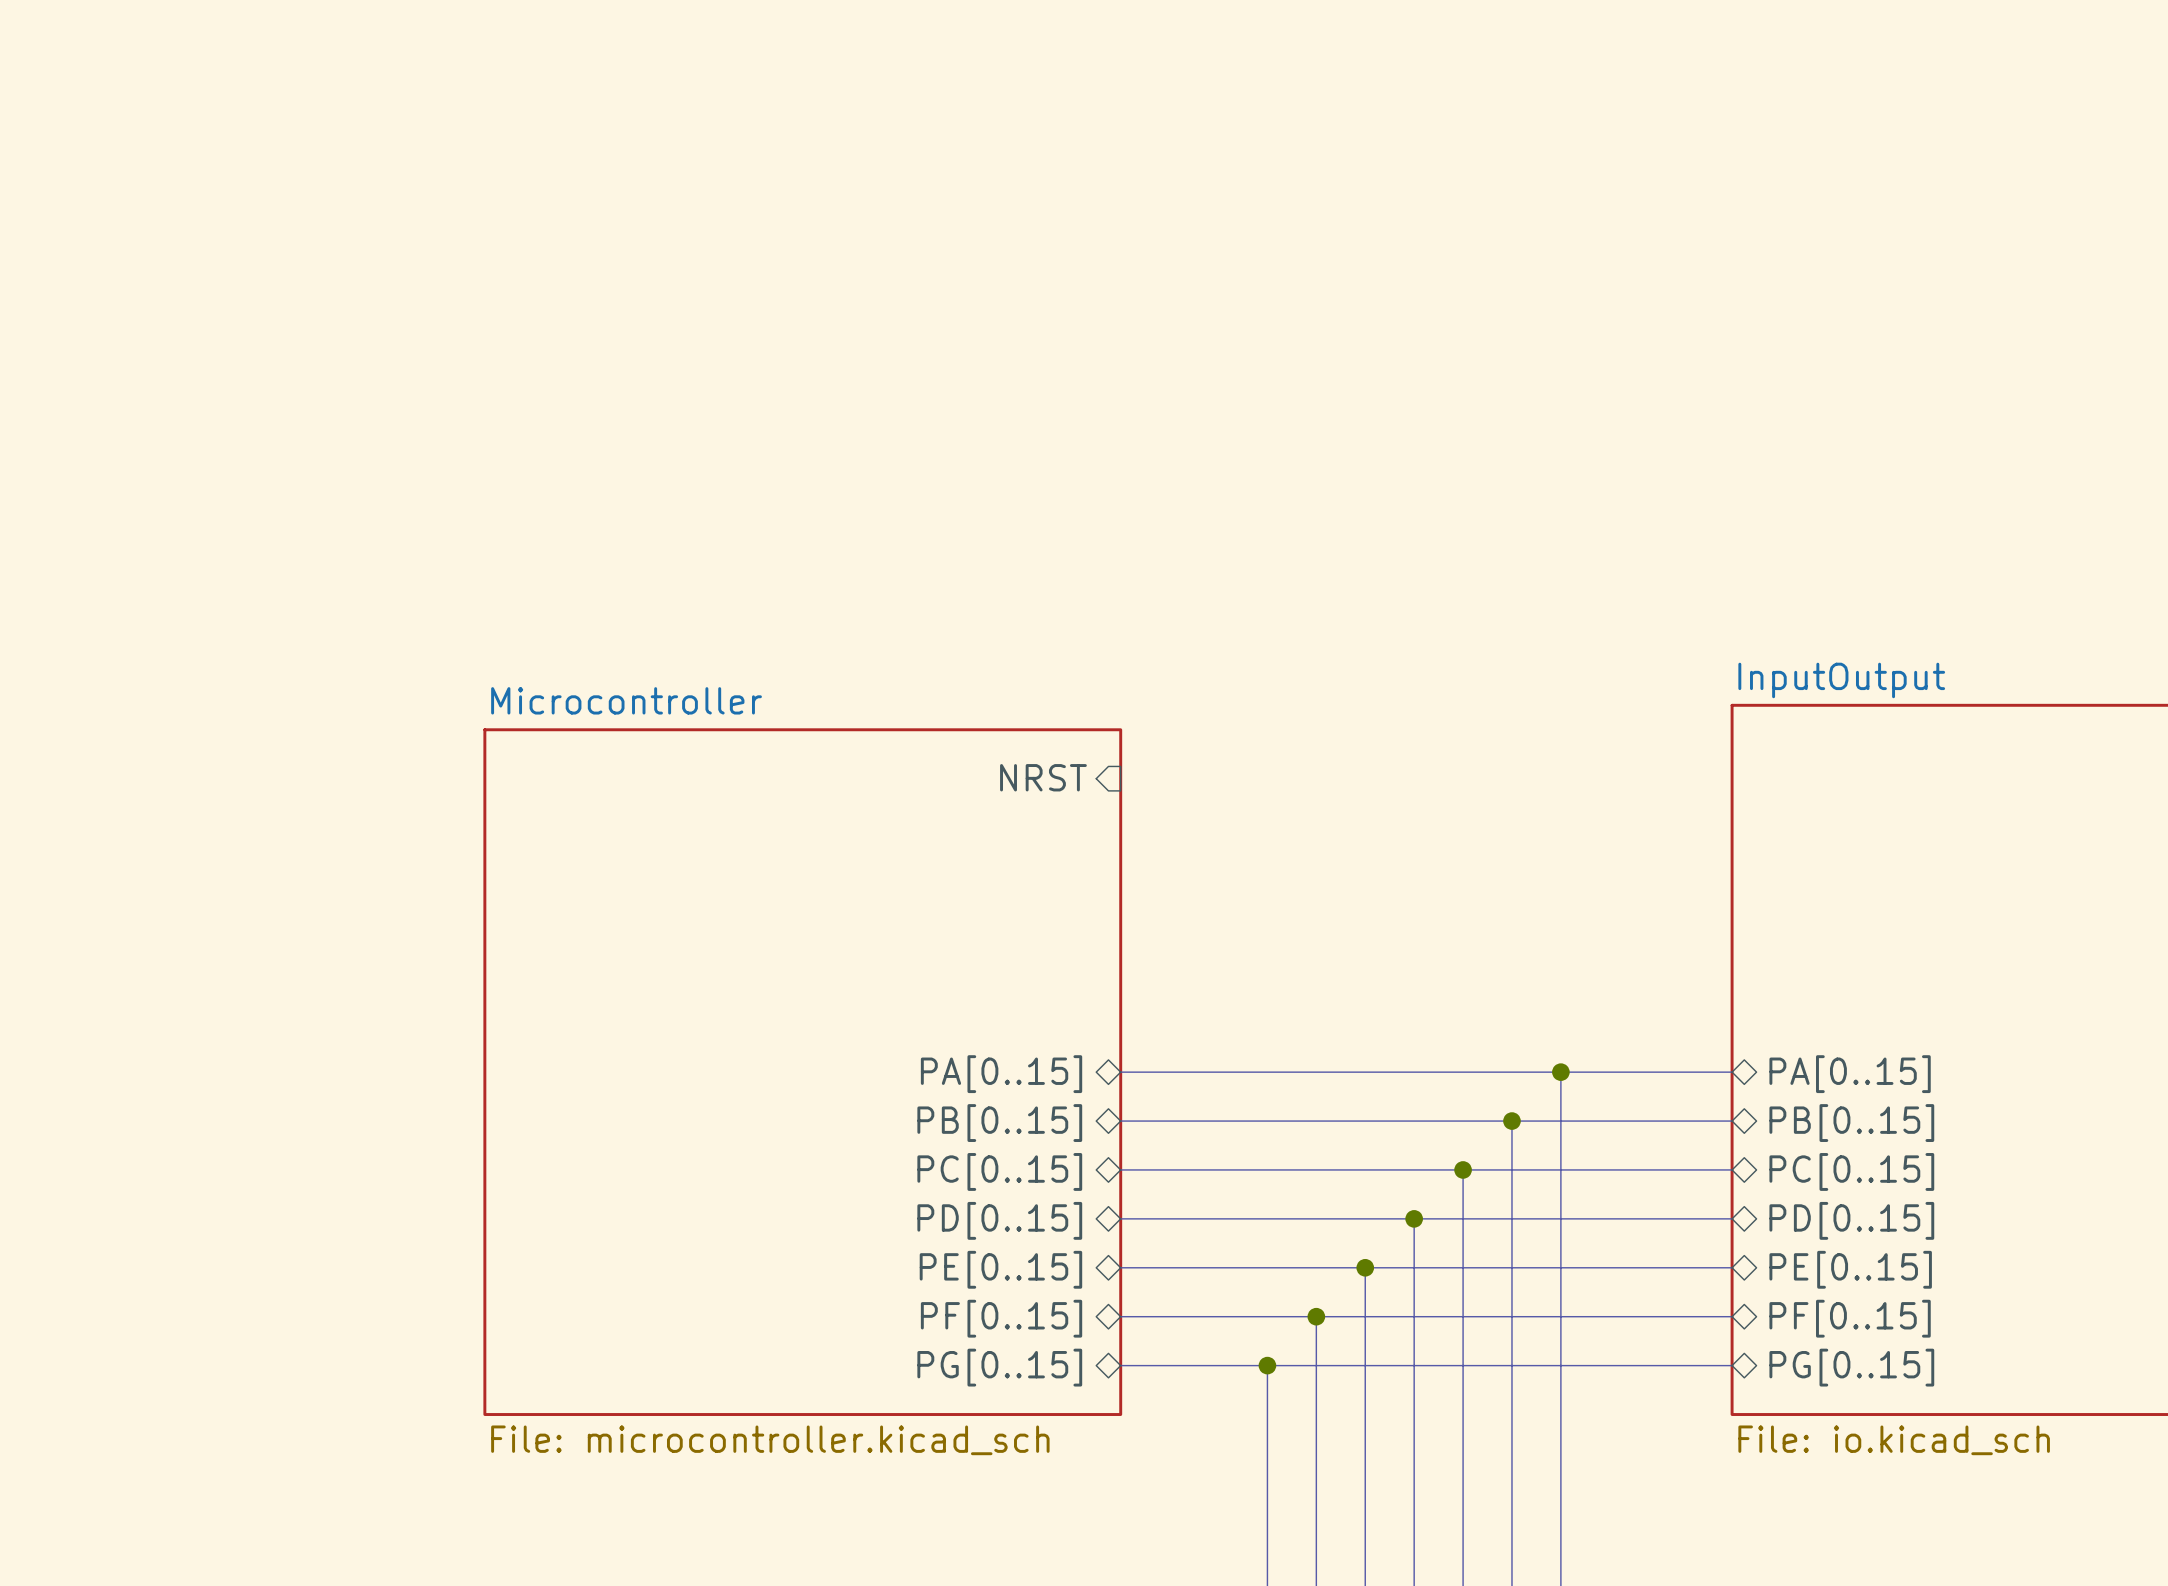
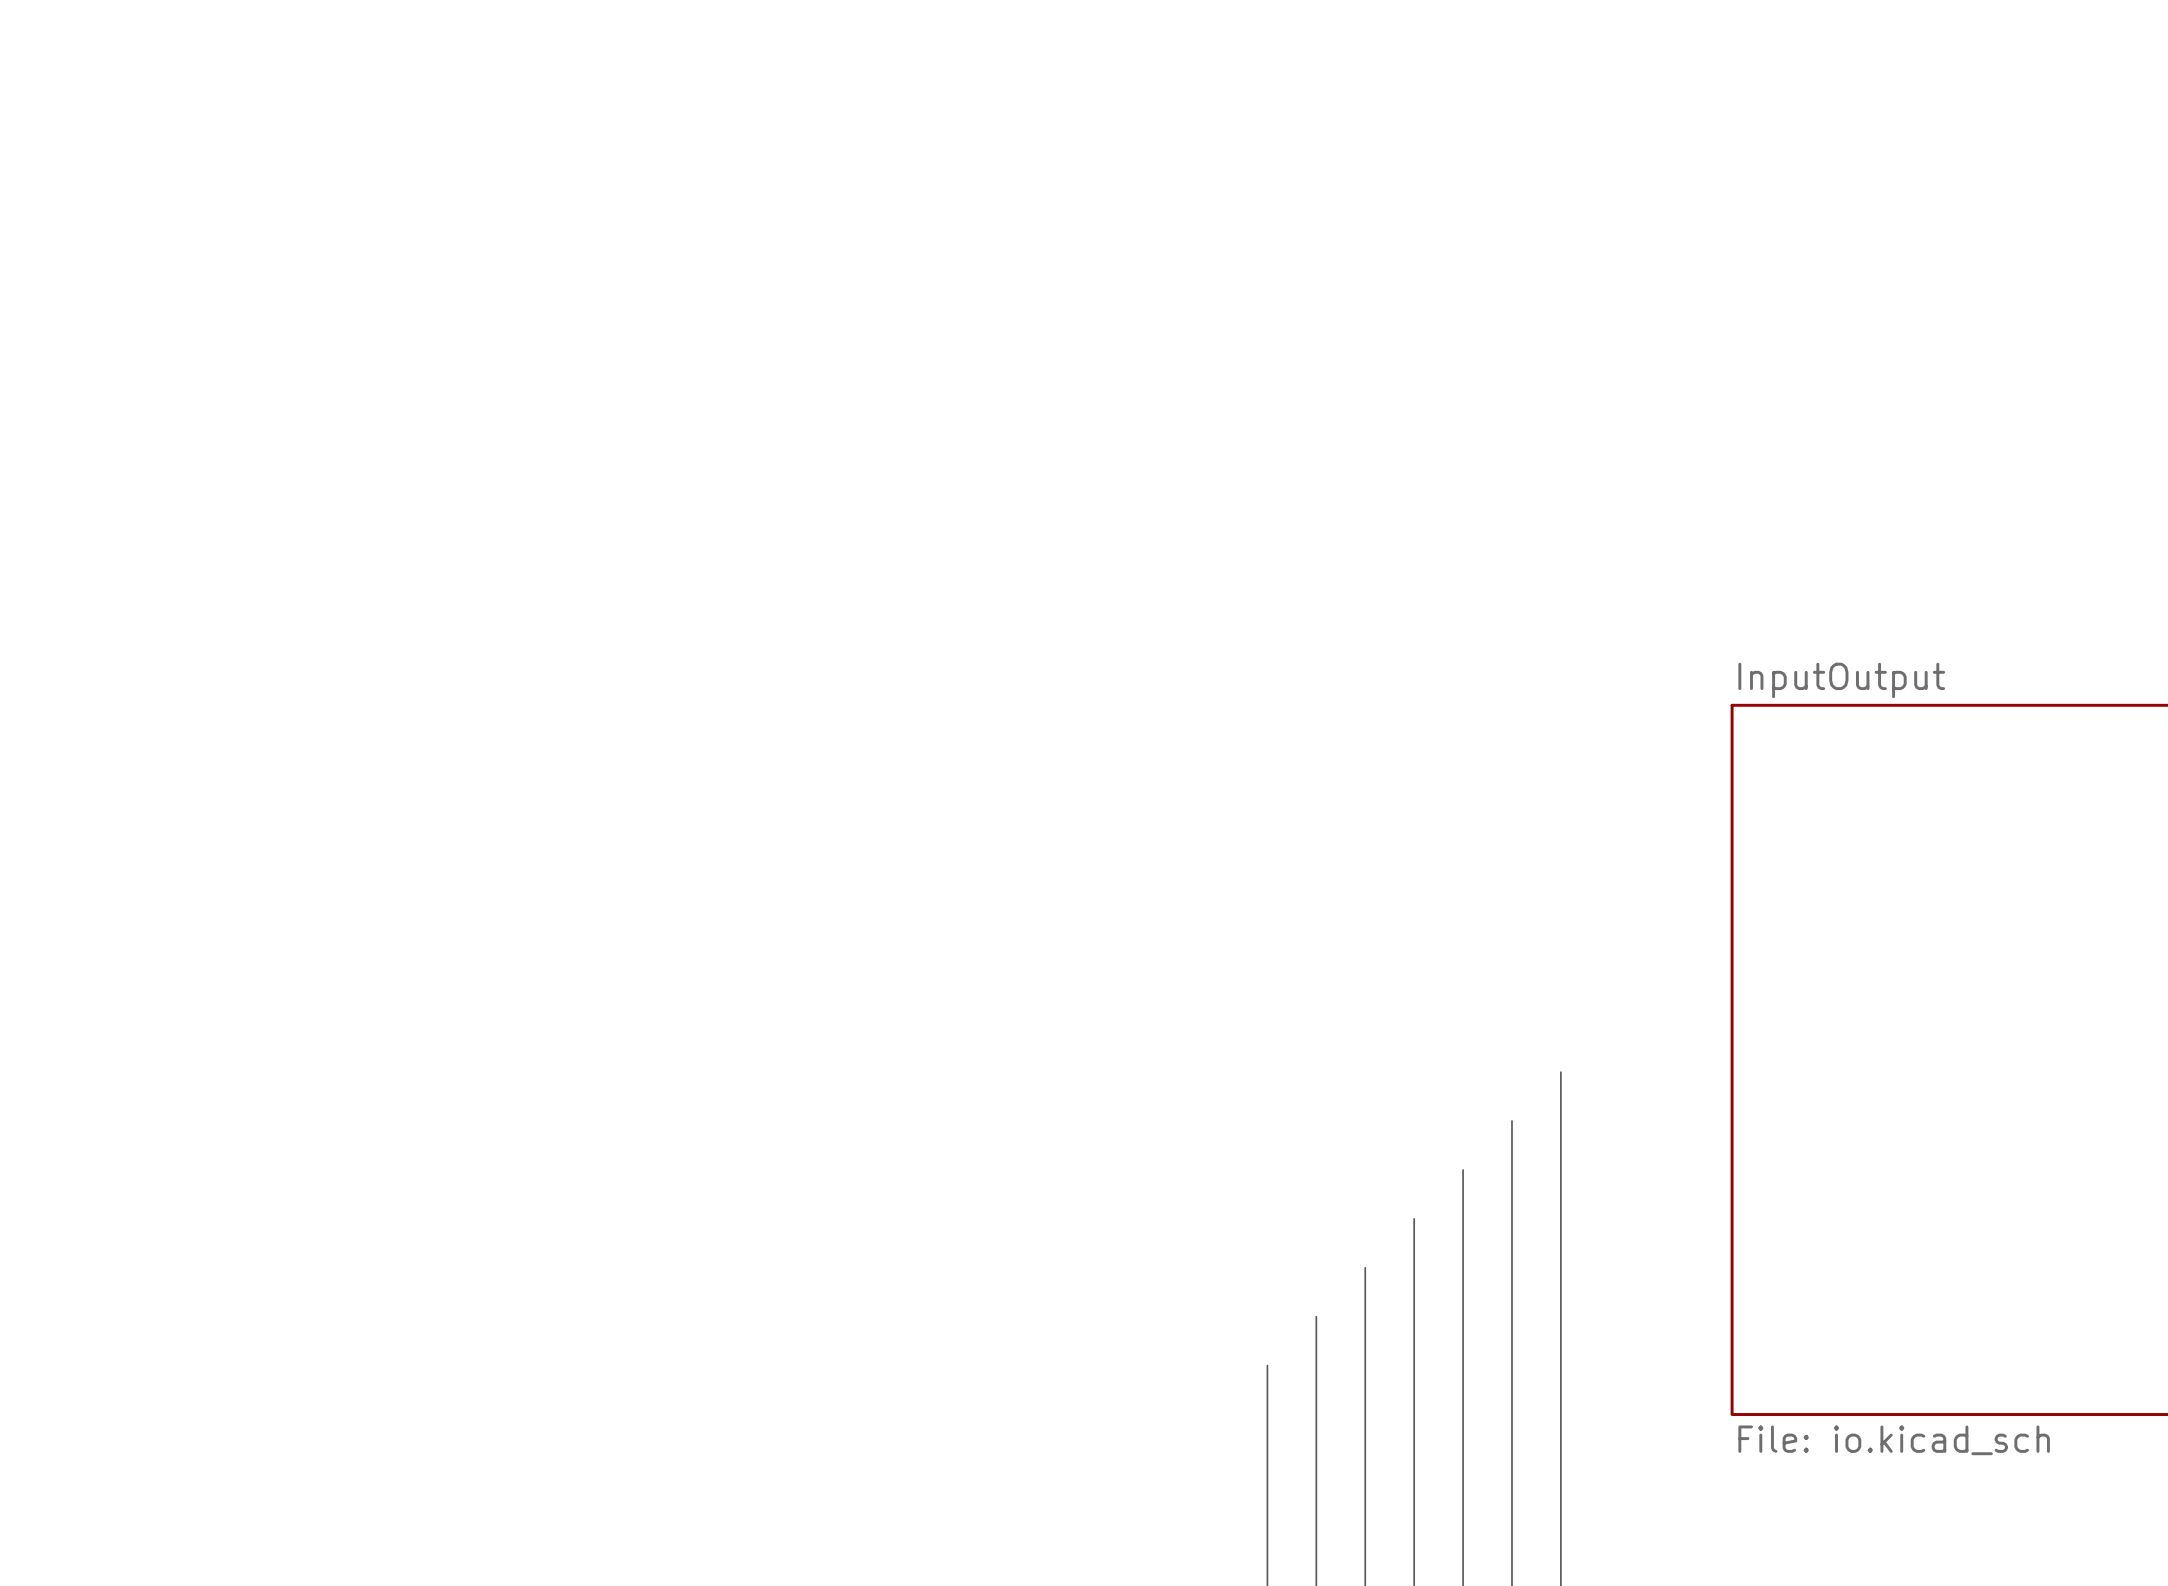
sheet pin: NRST (1043, 777) -> none
sheet Microcontroller: File: microcontroller.kicad_sch (802, 1072) -> none
bus: (1120, 1072) (1732, 1072) -> none
junction: (1560, 1072) -> none
sheet pin: PA[0..15] (1001, 1074) -> none
sheet pin: PA[0..15] (1850, 1074) -> none
bus: (1120, 1121) (1732, 1121) -> none
junction: (1511, 1121) -> none
sheet pin: PB[0..15] (999, 1123) -> none
sheet pin: PB[0..15] (1851, 1123) -> none
bus: (1120, 1169) (1732, 1169) -> none
junction: (1463, 1169) -> none
sheet pin: PC[0..15] (999, 1171) -> none
sheet pin: PC[0..15] (1851, 1171) -> none
bus: (1120, 1218) (1732, 1218) -> none
junction: (1414, 1218) -> none
sheet pin: PD[0..15] (999, 1220) -> none
sheet pin: PD[0..15] (1851, 1220) -> none
bus: (1120, 1267) (1732, 1267) -> none
junction: (1365, 1267) -> none
sheet pin: PE[0..15] (1000, 1269) -> none
sheet pin: PE[0..15] (1850, 1269) -> none
bus: (1120, 1316) (1732, 1316) -> none
junction: (1316, 1316) -> none
sheet pin: PF[0..15] (1001, 1318) -> none
sheet pin: PF[0..15] (1850, 1318) -> none
bus: (1120, 1365) (1732, 1365) -> none
junction: (1267, 1365) -> none
sheet pin: PG[0..15] (999, 1367) -> none
sheet pin: PG[0..15] (1851, 1367) -> none

